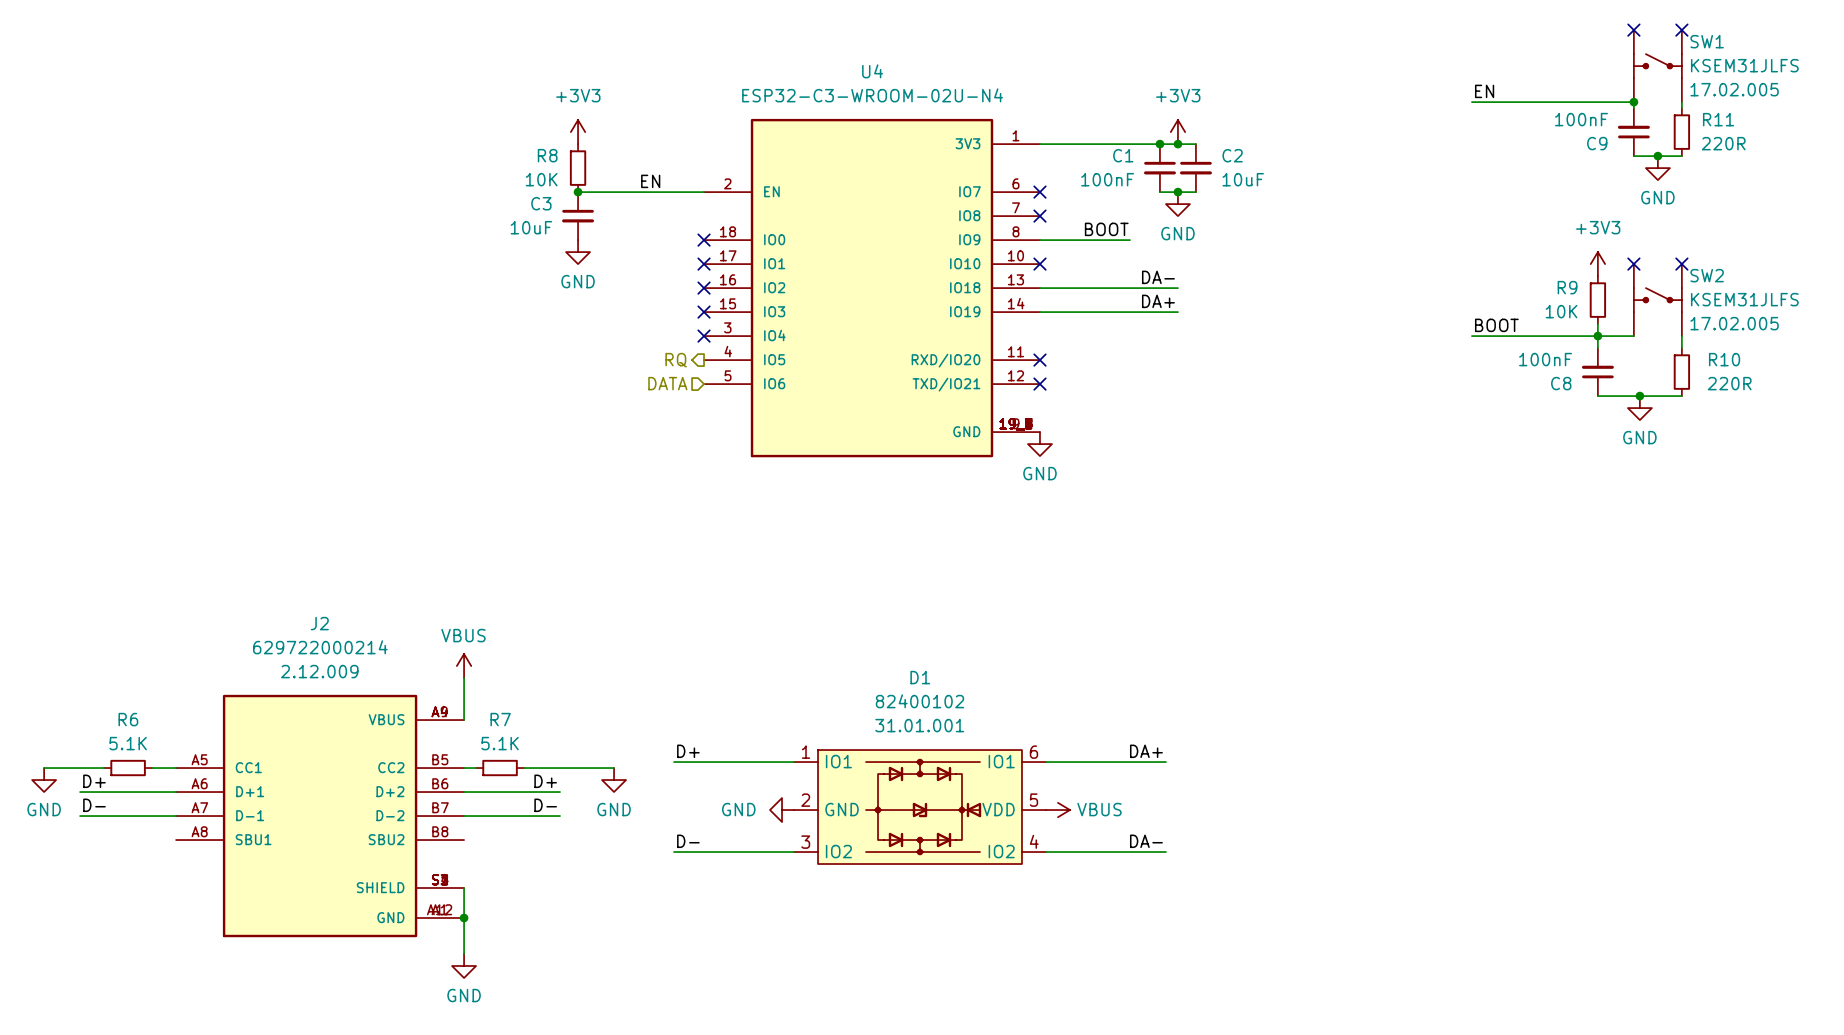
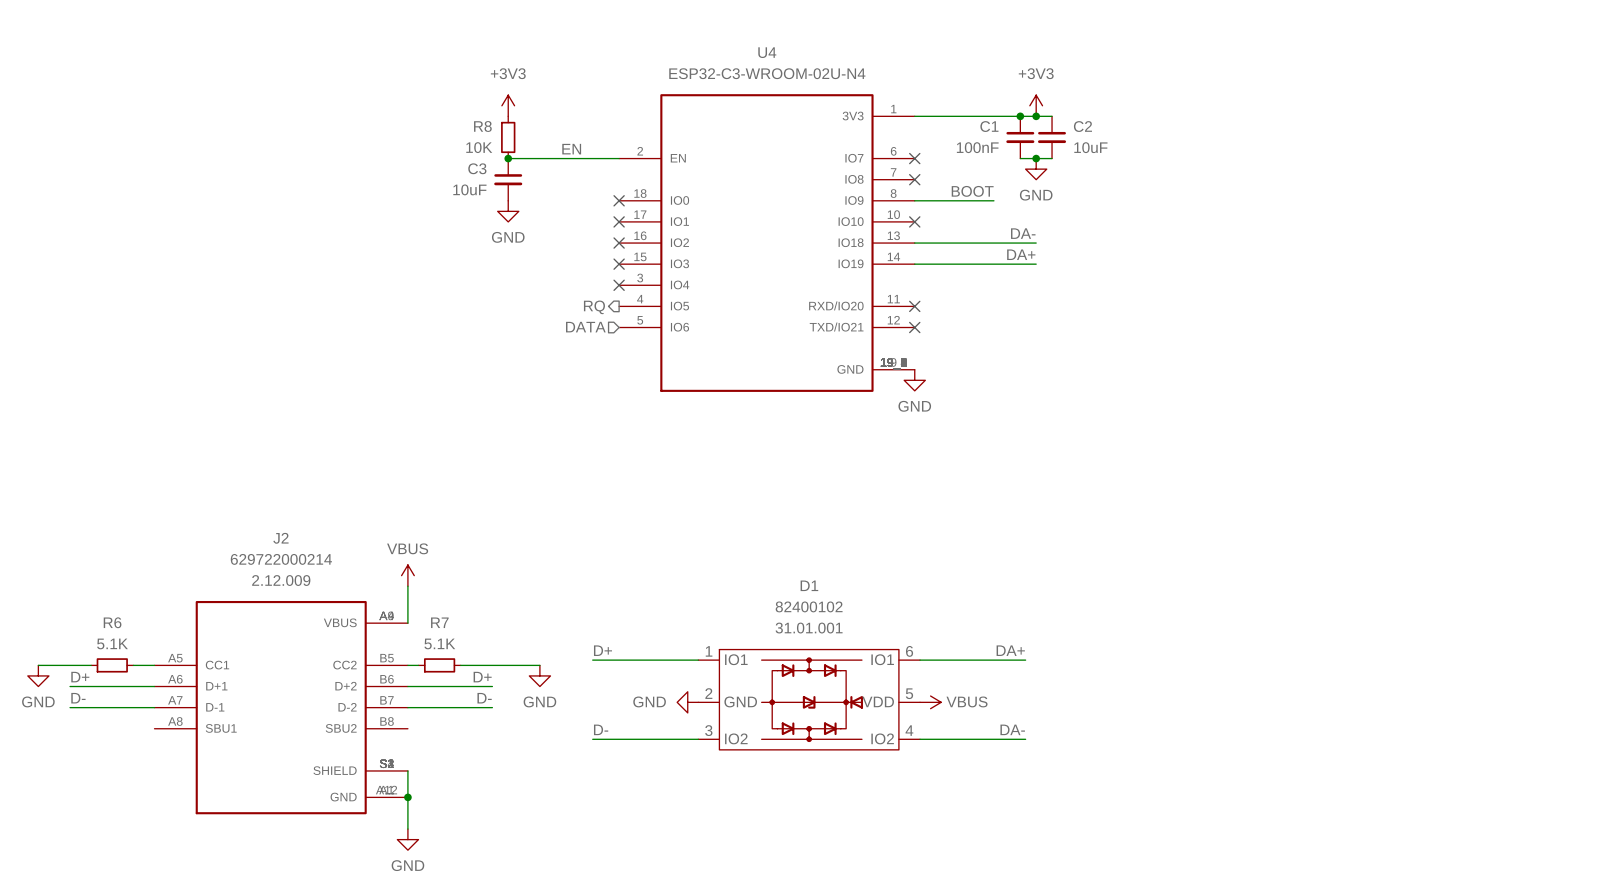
no-connect mark: (1633, 30) -> none
no-connect mark: (1681, 30) -> none
SW1: KSEM31JLFS (1657, 66) -> none
label: EN (1484, 91) -> none
wire: (1471, 102) (1633, 102) (1633, 108) -> none
junction: (1633, 102) -> none
wire: (1681, 102) (1681, 108) -> none
C9: 100nF (1633, 132) -> none
R11: 220R (1681, 132) -> none
wire: (1633, 156) (1681, 156) -> none
junction: (1657, 156) -> none
power symbol: GND (1657, 168) -> none
power symbol: +3V3 (1597, 264) -> none
no-connect mark: (1633, 264) -> none
no-connect mark: (1681, 264) -> none
R9: 10K (1597, 300) -> none
SW2: KSEM31JLFS (1657, 300) -> none
wire: (1597, 324) (1597, 348) -> none
label: BOOT (1496, 325) -> none
wire: (1471, 336) (1633, 336) -> none
junction: (1597, 336) -> none
wire: (1681, 336) (1681, 348) -> none
C8: 100nF (1597, 372) -> none
R10: 220R (1681, 372) -> none
wire: (1597, 396) (1681, 396) -> none
junction: (1639, 396) -> none
power symbol: GND (1639, 408) -> none

